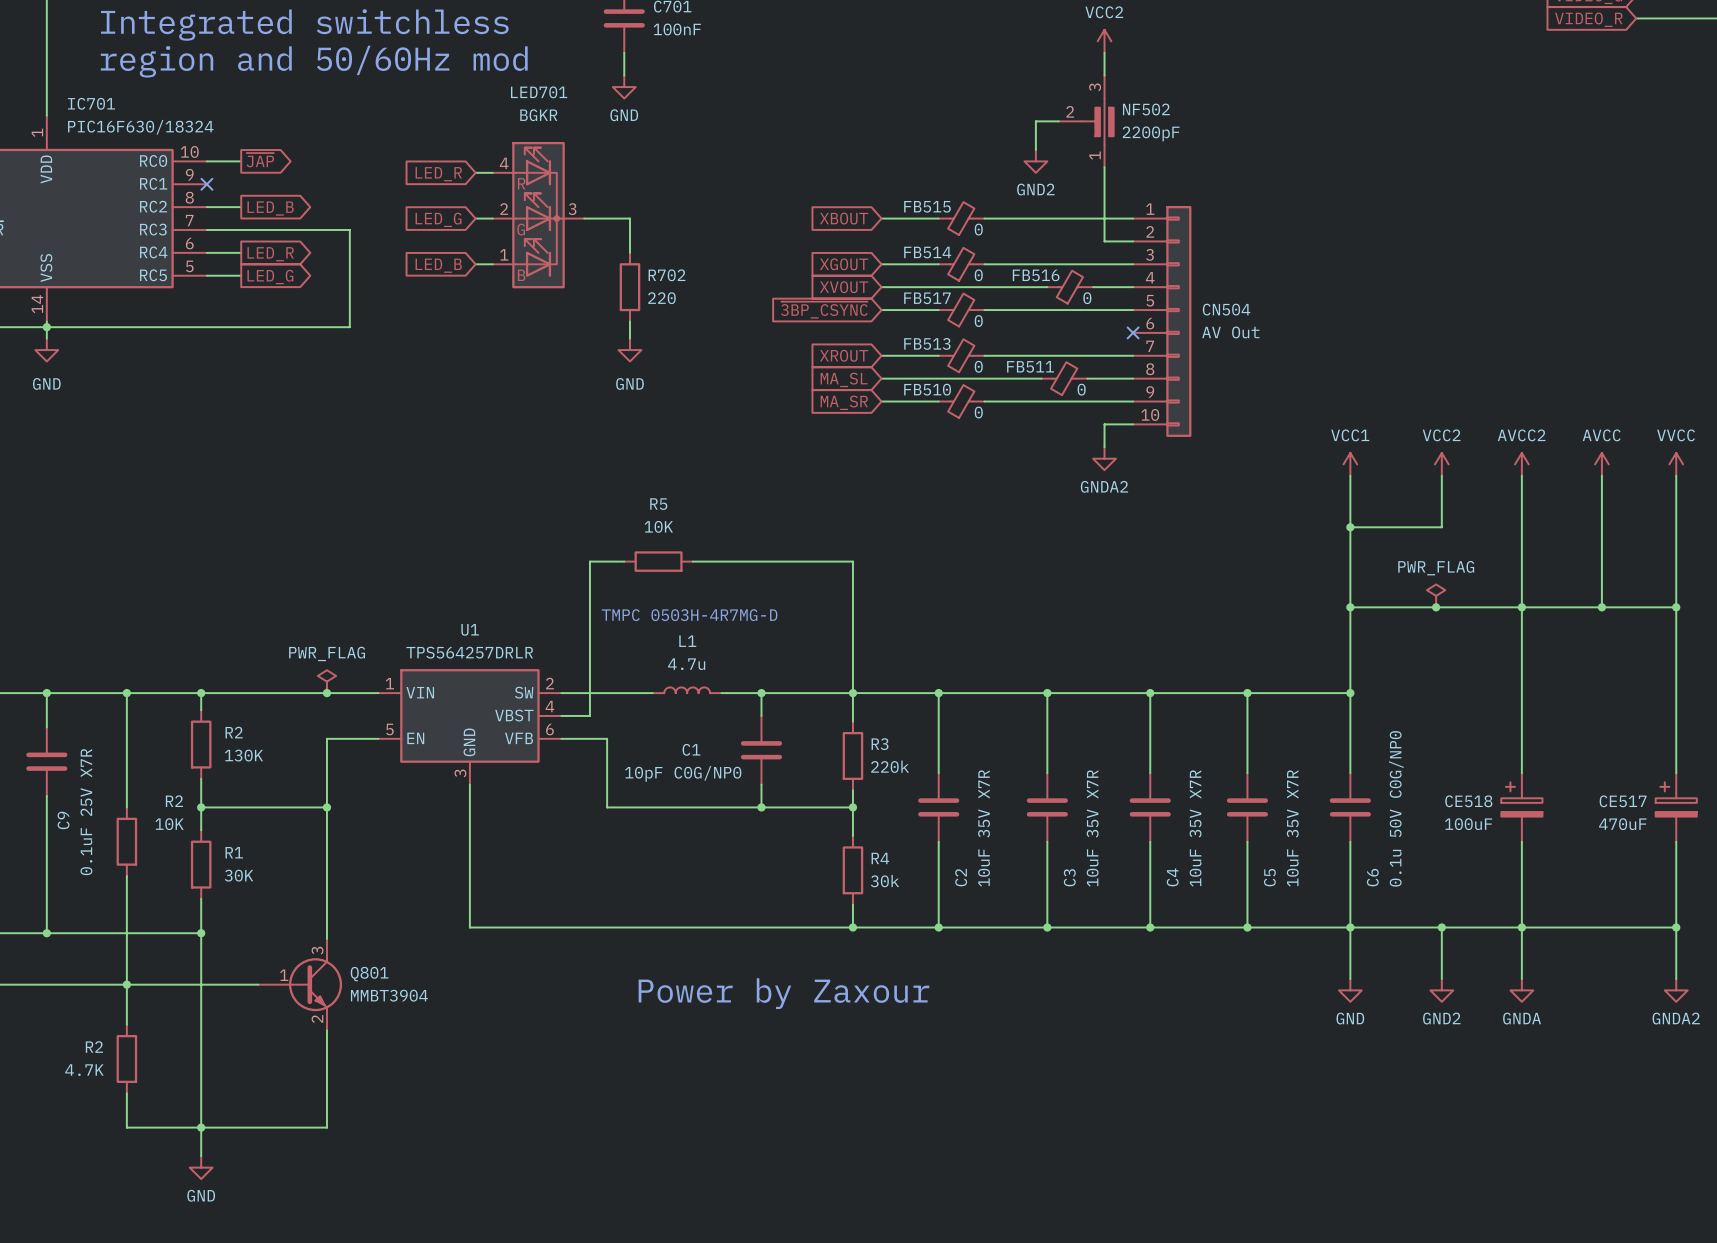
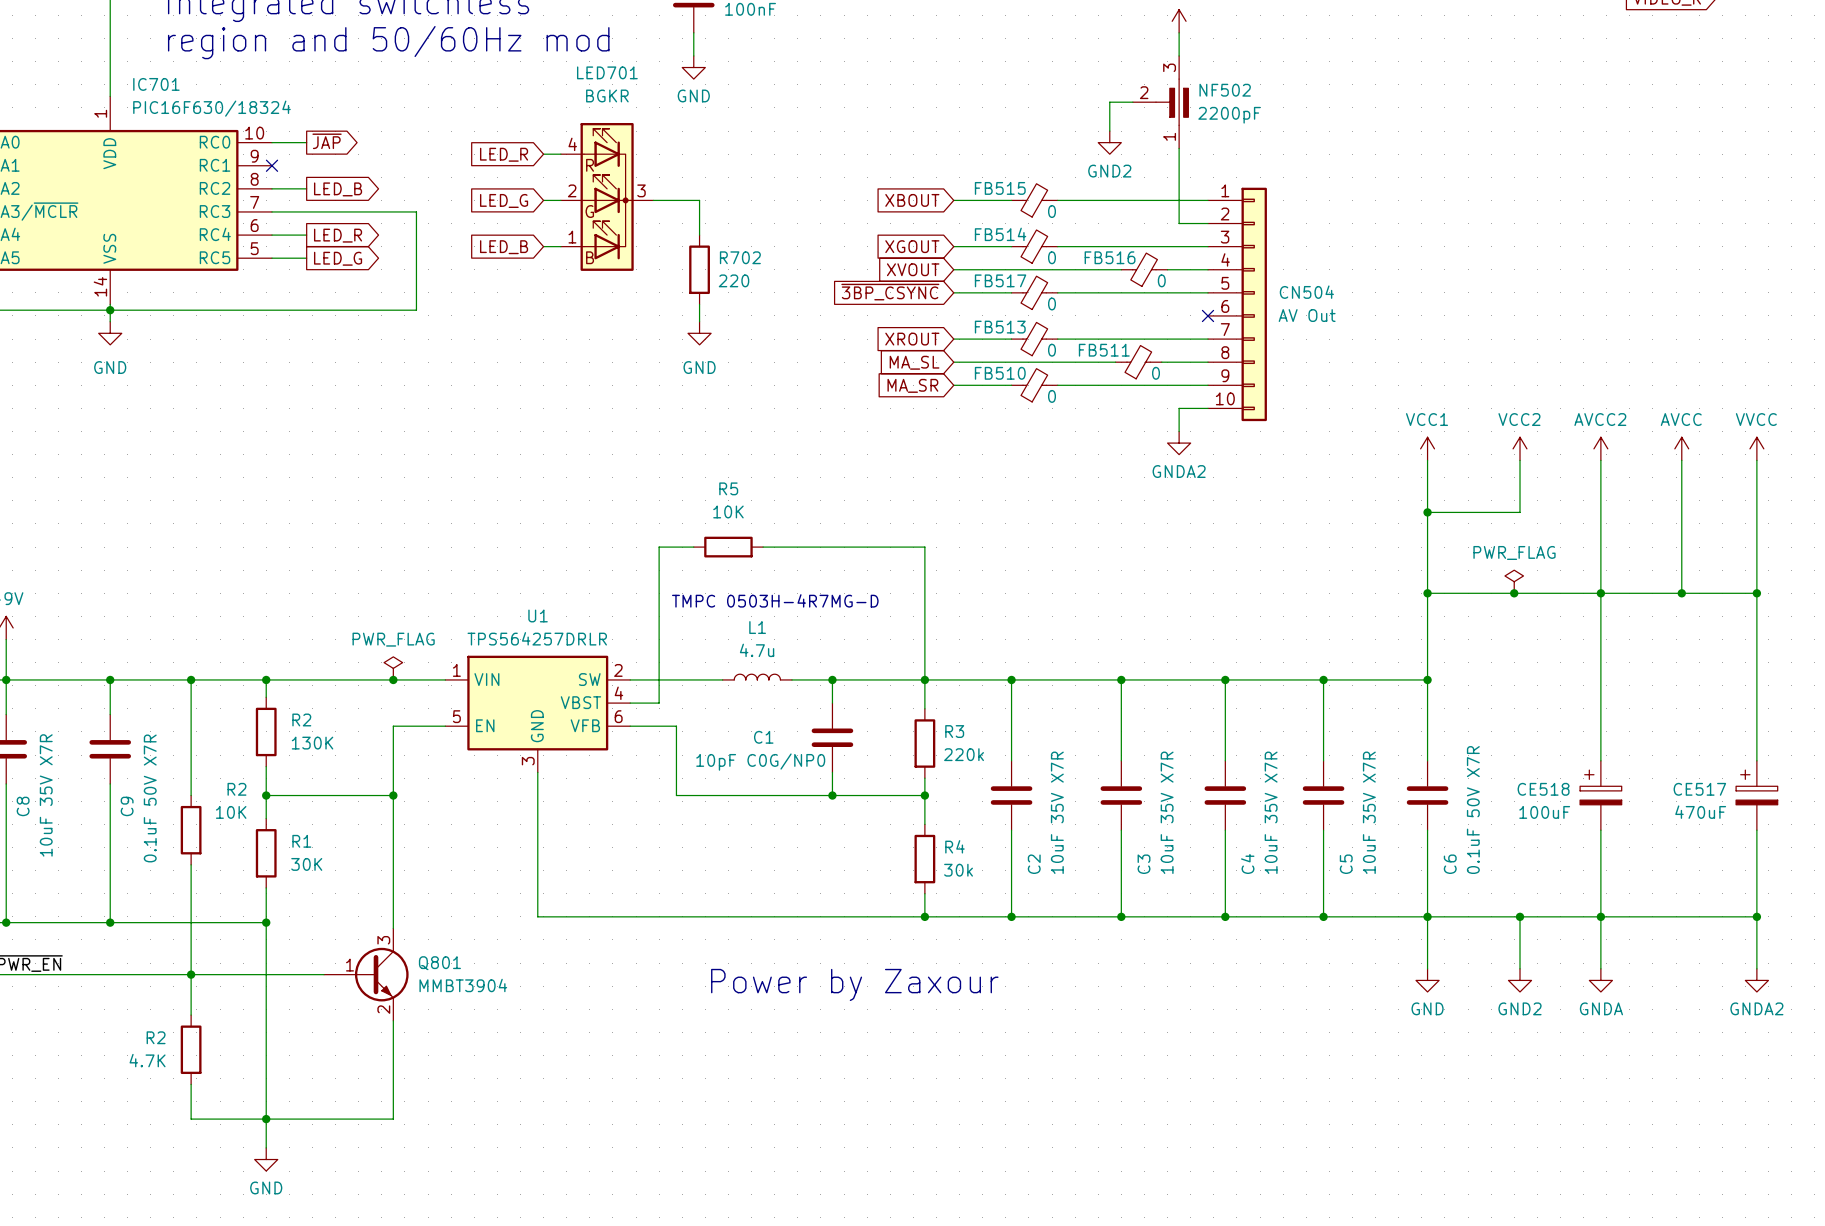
C6 value: 0.1u 50V C0G/NP0 (1396, 808) -> 0.1uF 50V X7R (1473, 810)
C9 value: 0.1uF 25V X7R (86, 812) -> 0.1uF 50V X7R (150, 798)

